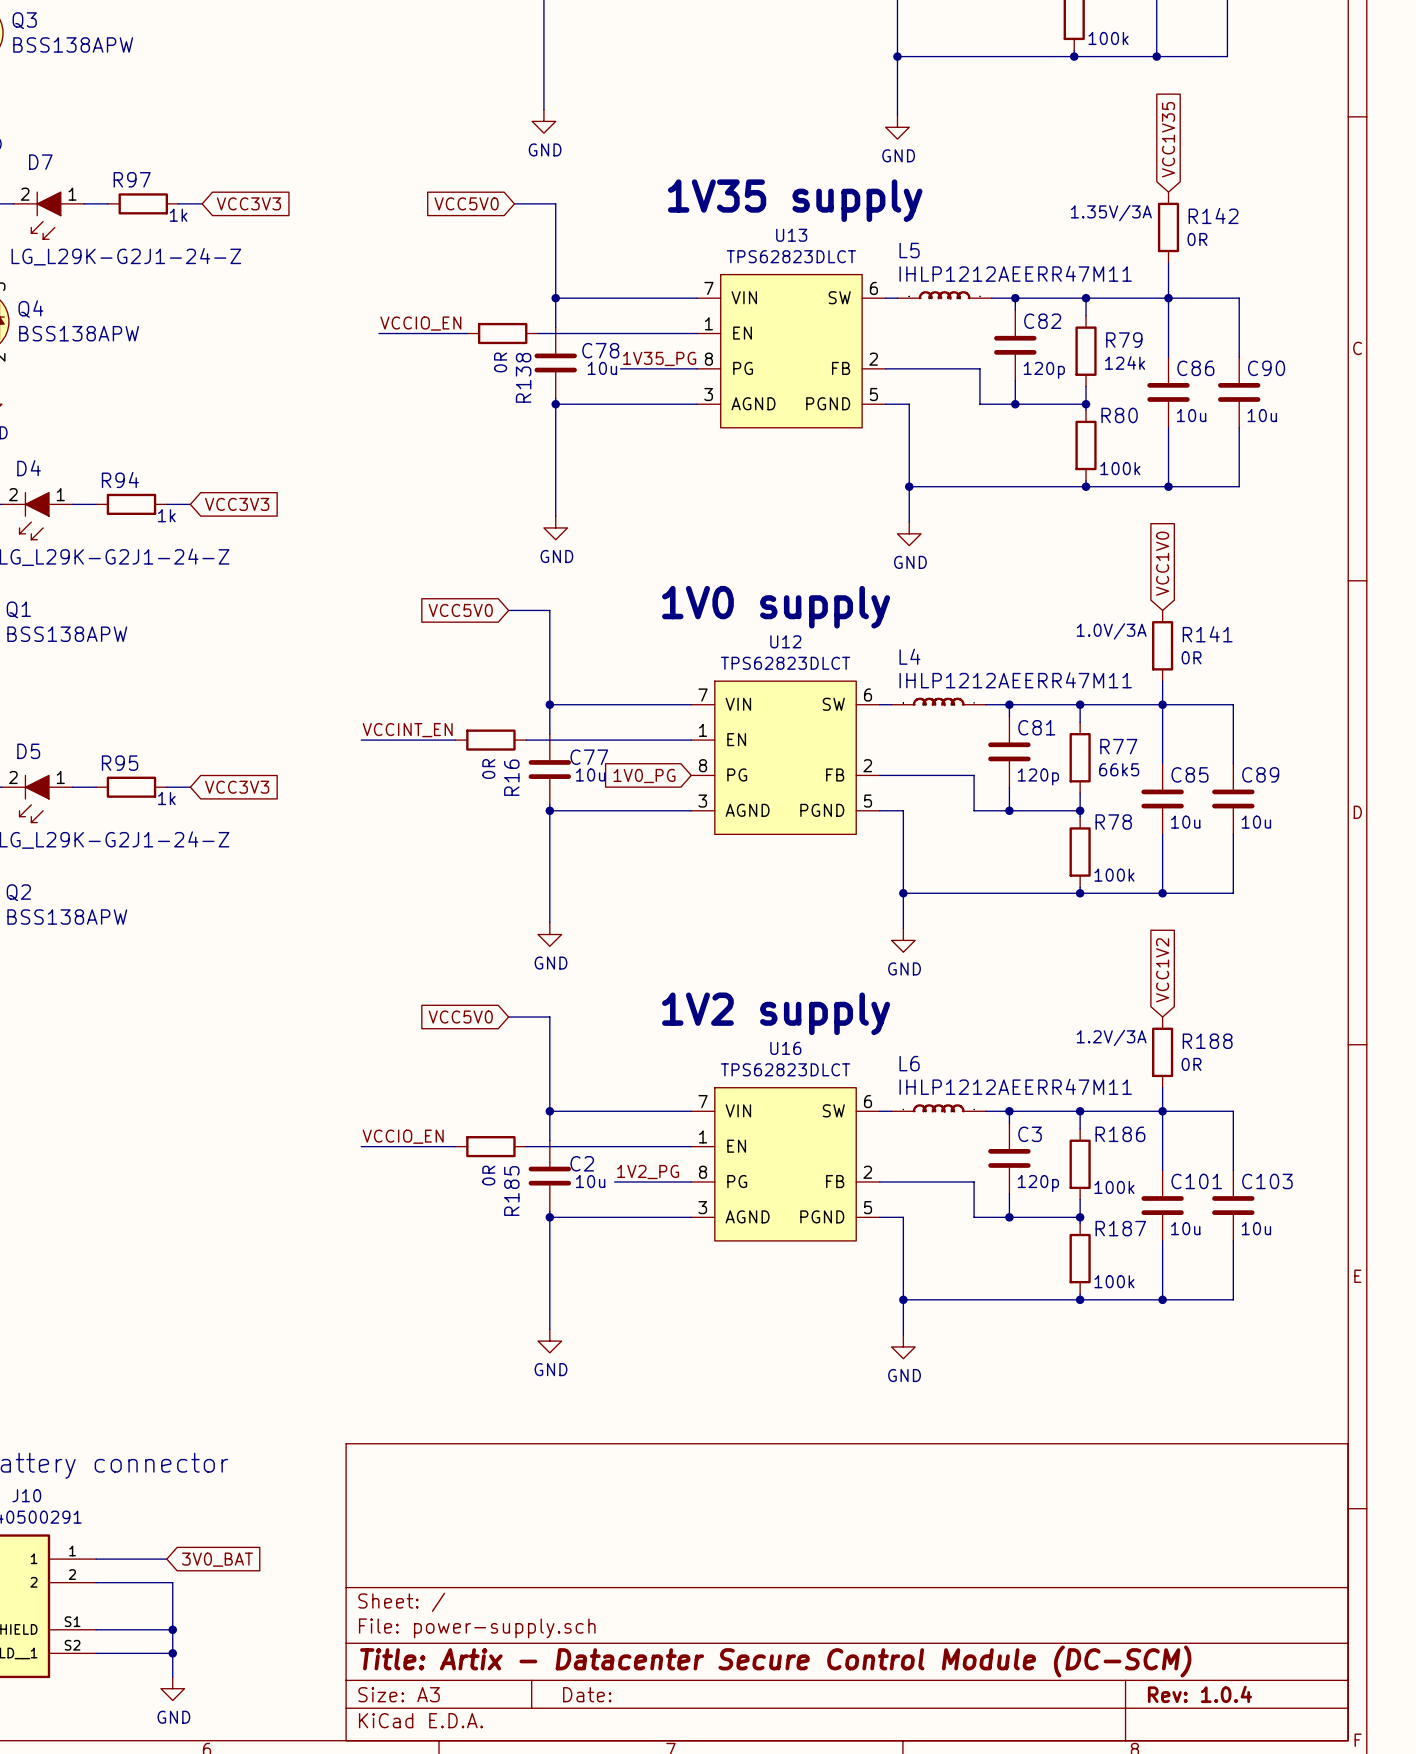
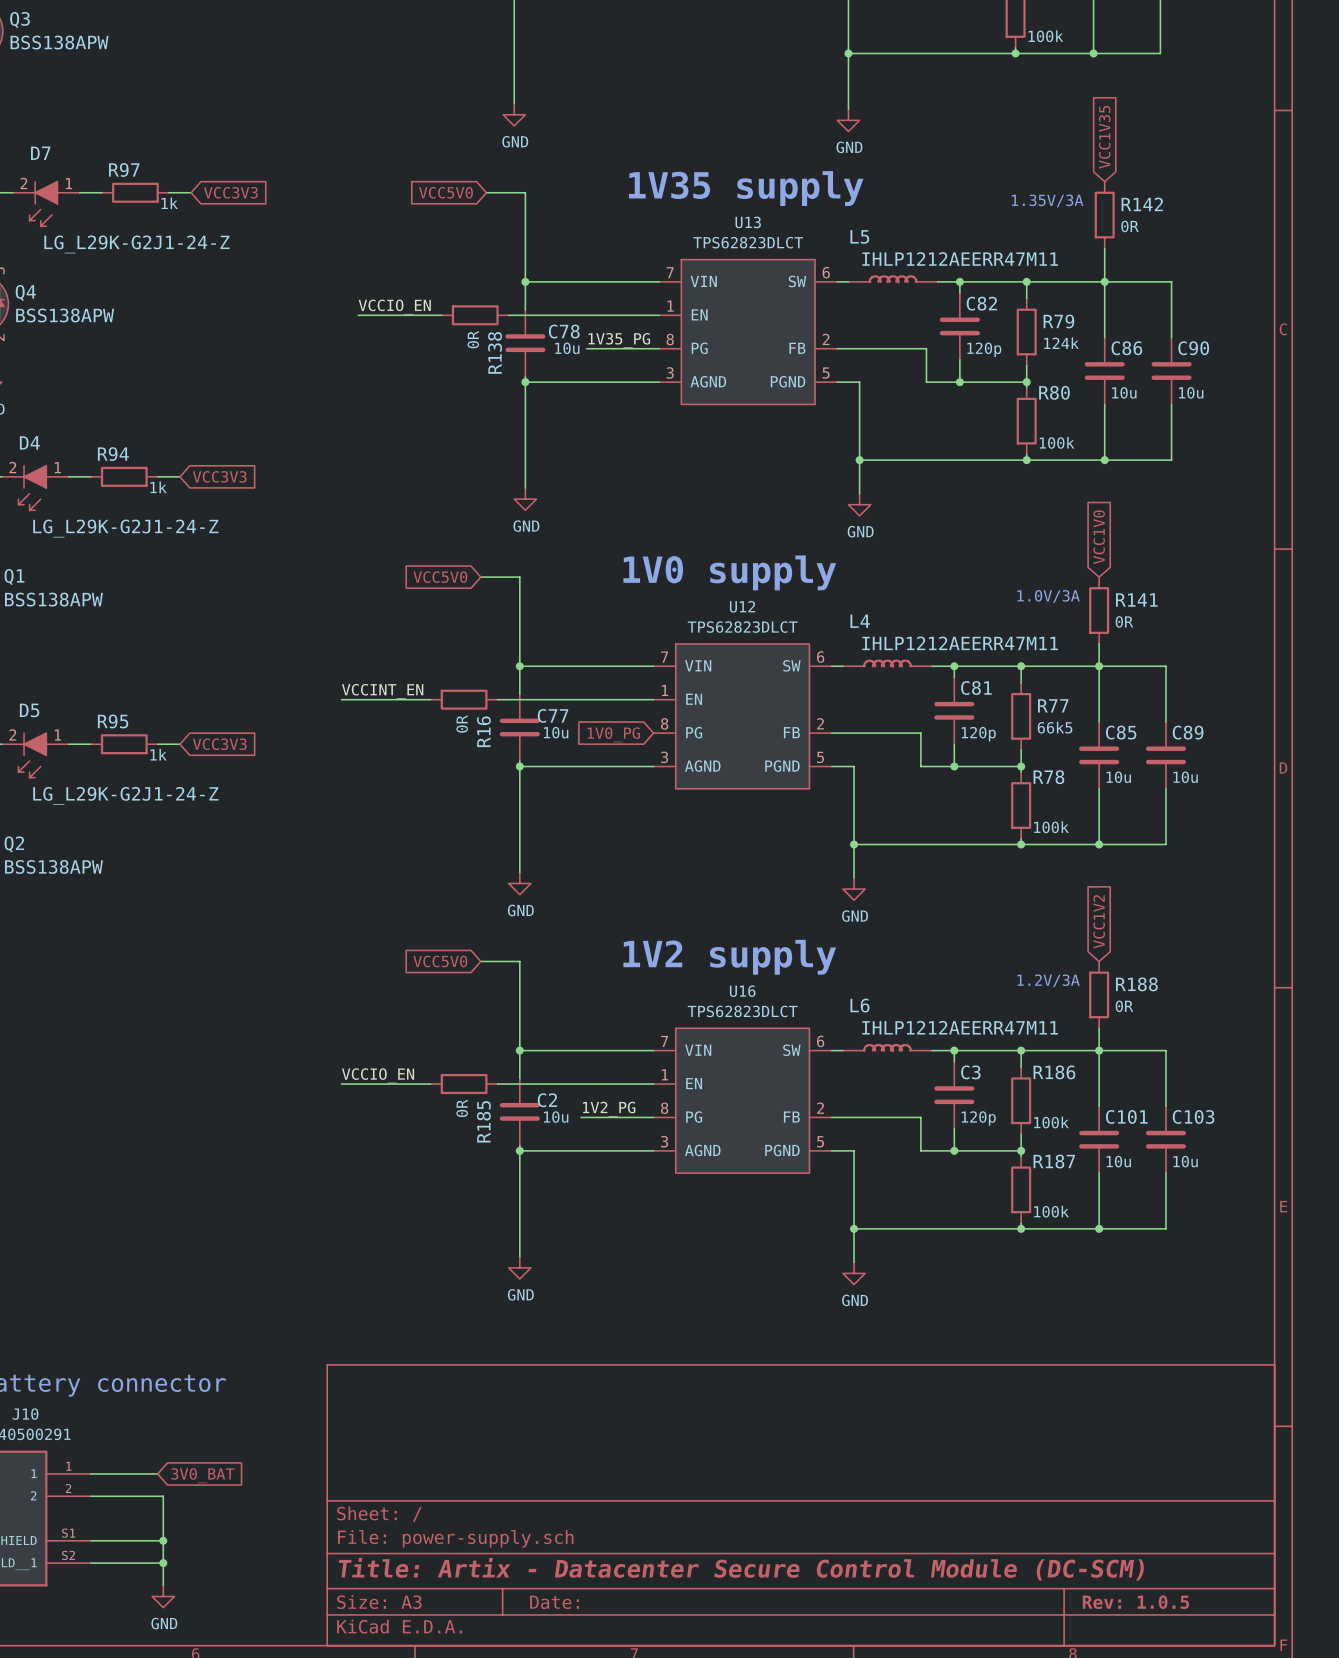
title block: Rev: 1.0.4 (1199, 1694) -> Rev: 1.0.5 (1135, 1602)

